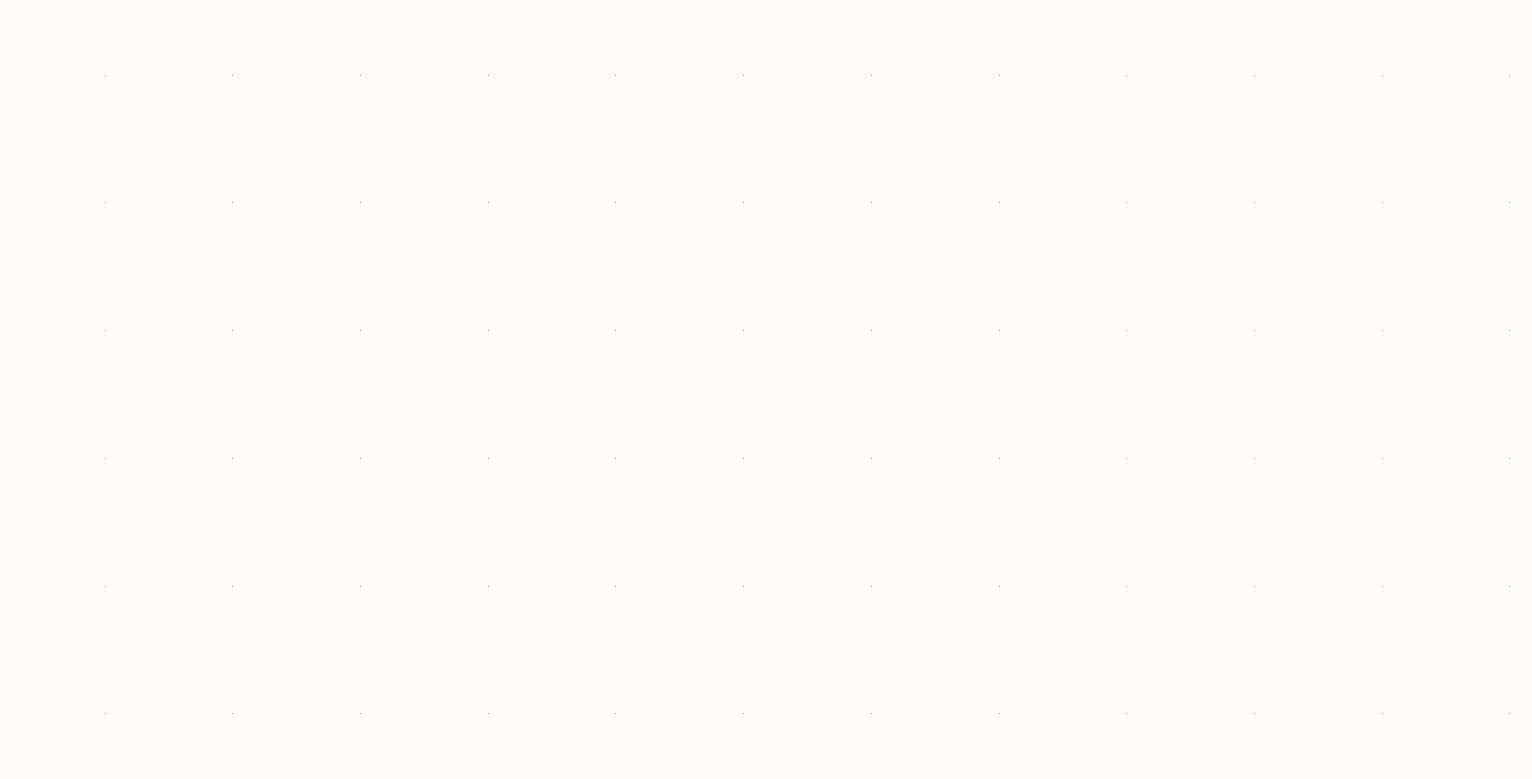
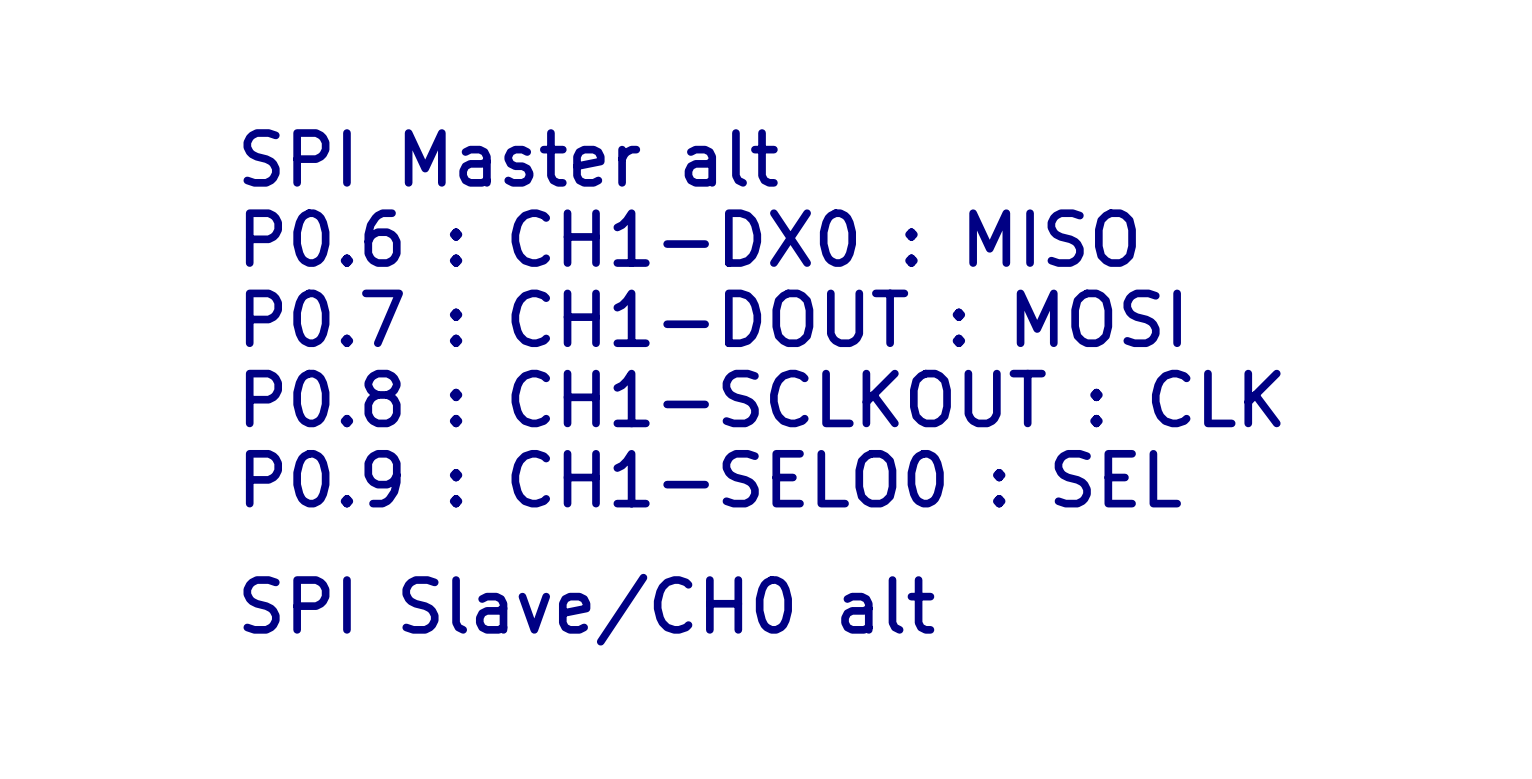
text: none -> SPI Master alt (510, 157)
text: none -> P0.6 : CH1-DX0 : MISO (690, 238)
text: none -> P0.7 : CH1-DOUT : MOSI (713, 318)
text: none -> P0.8 : CH1-SCLKOUT : CLK (763, 398)
text: none -> P0.9 : CH1-SELO0 : SEL (713, 478)
text: none -> SPI Slave/CH0 alt (588, 609)

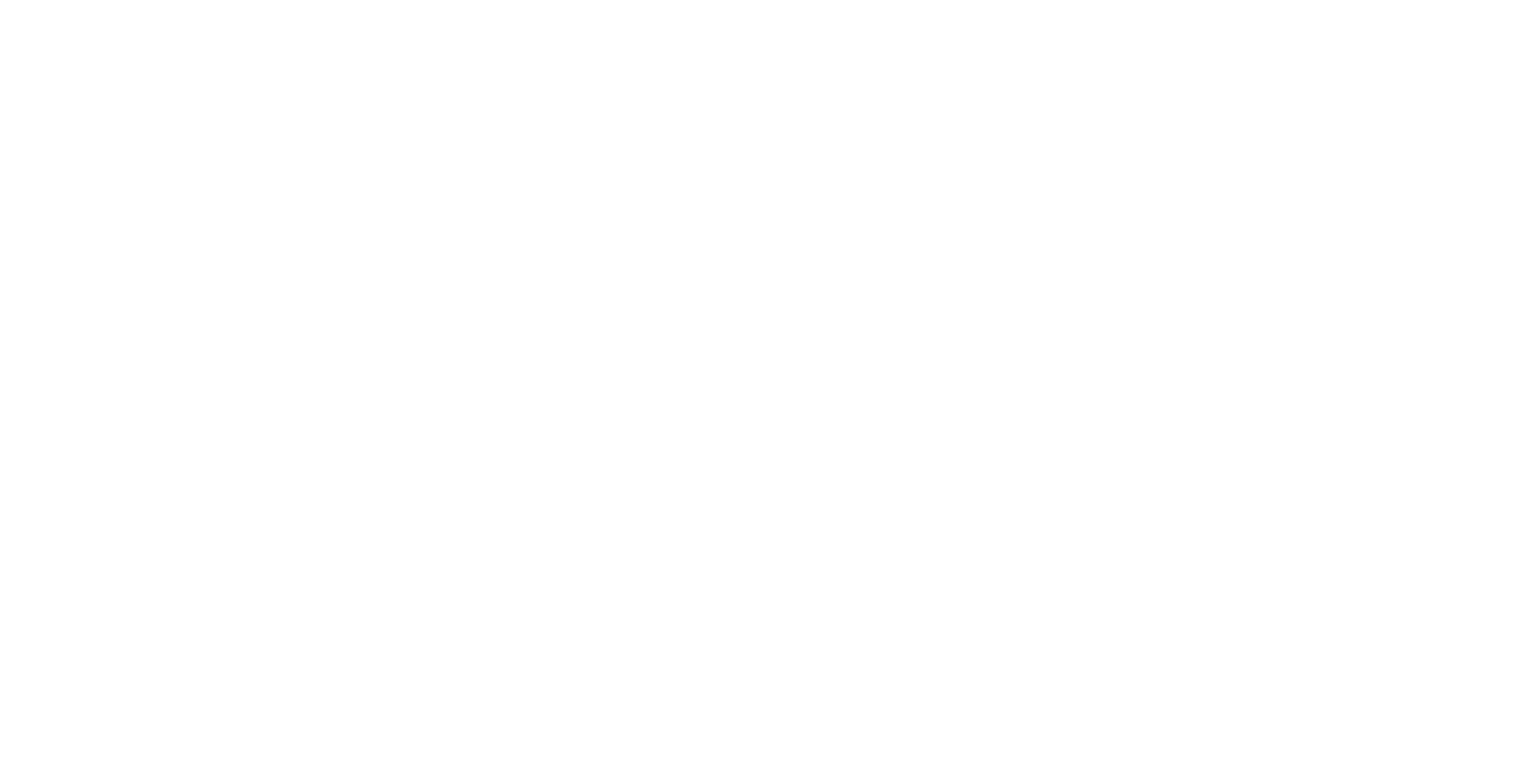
text: SPI Master alt (510, 157) -> none
text: P0.6 : CH1-DX0 : MISO (690, 238) -> none
text: P0.7 : CH1-DOUT : MOSI (713, 318) -> none
text: P0.8 : CH1-SCLKOUT : CLK (763, 398) -> none
text: P0.9 : CH1-SELO0 : SEL (713, 478) -> none
text: SPI Slave/CH0 alt (588, 609) -> none

